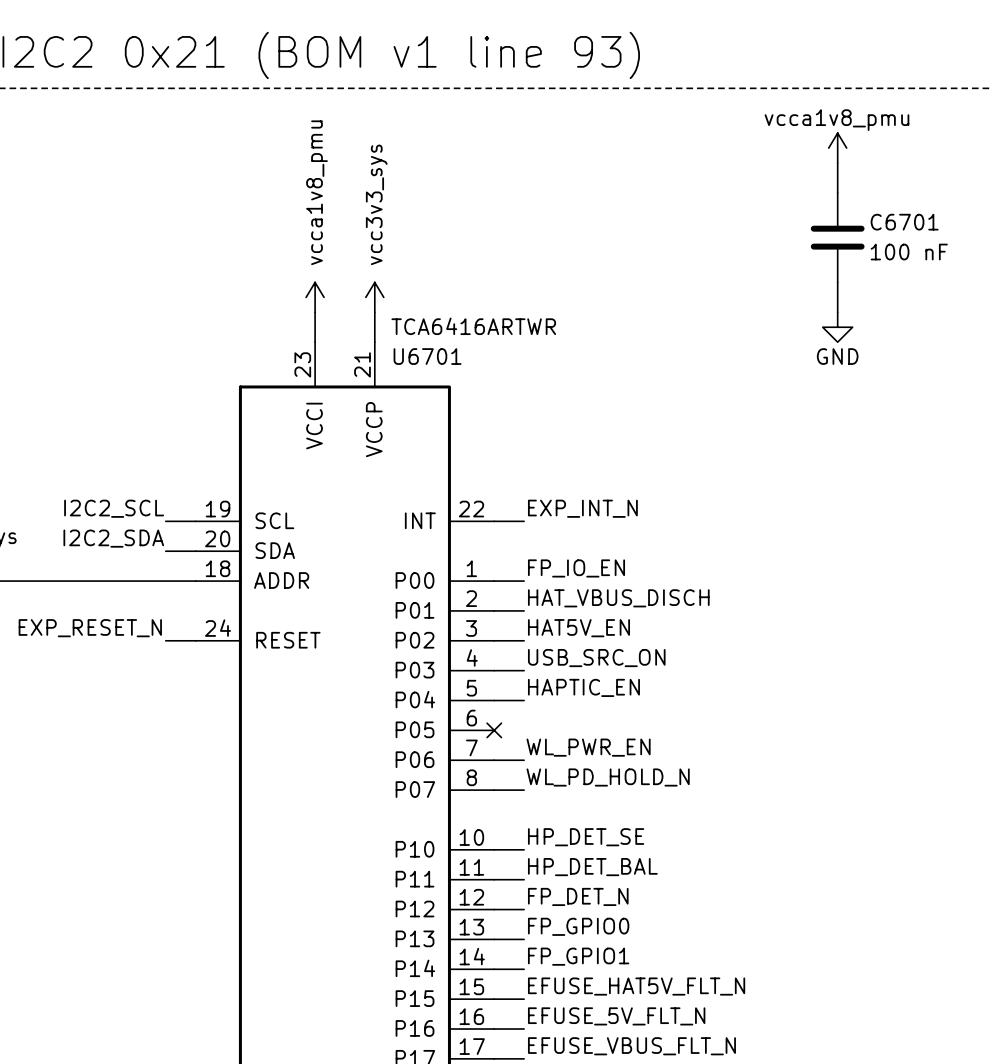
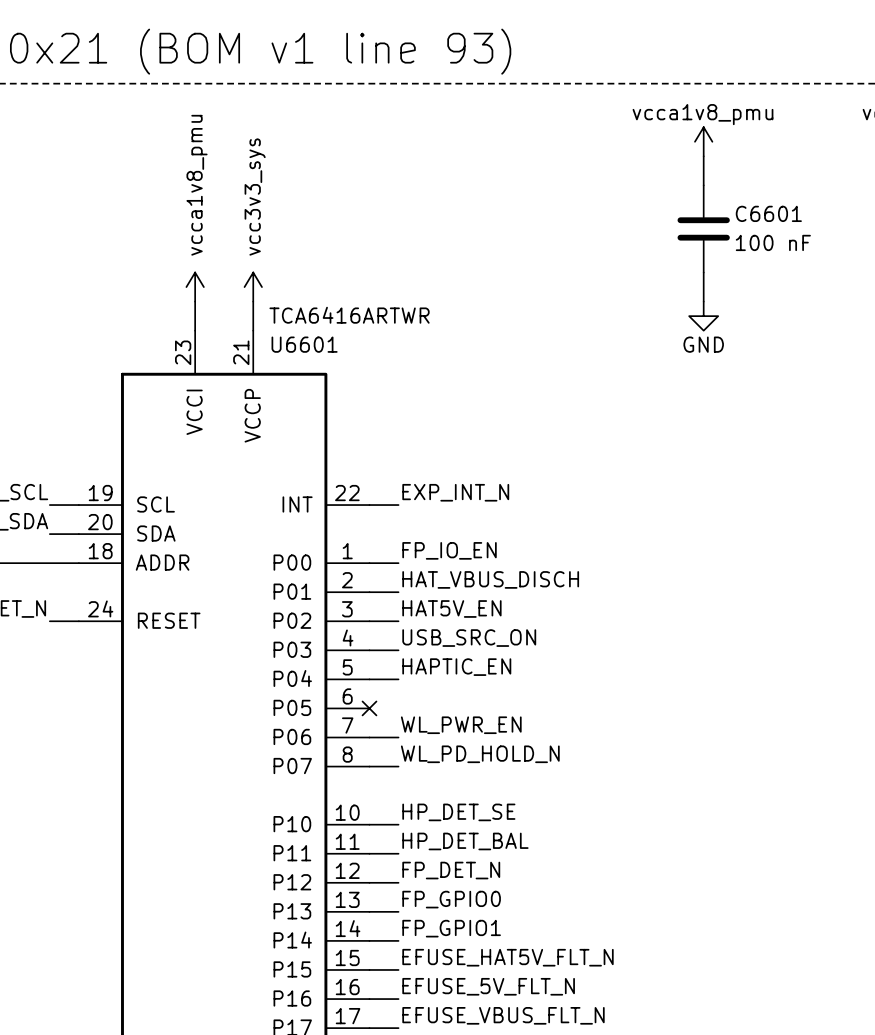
C6701 name: C6701 (904, 222) -> C6601 (768, 213)
U6701 name: U6701 (427, 356) -> U6601 (304, 344)

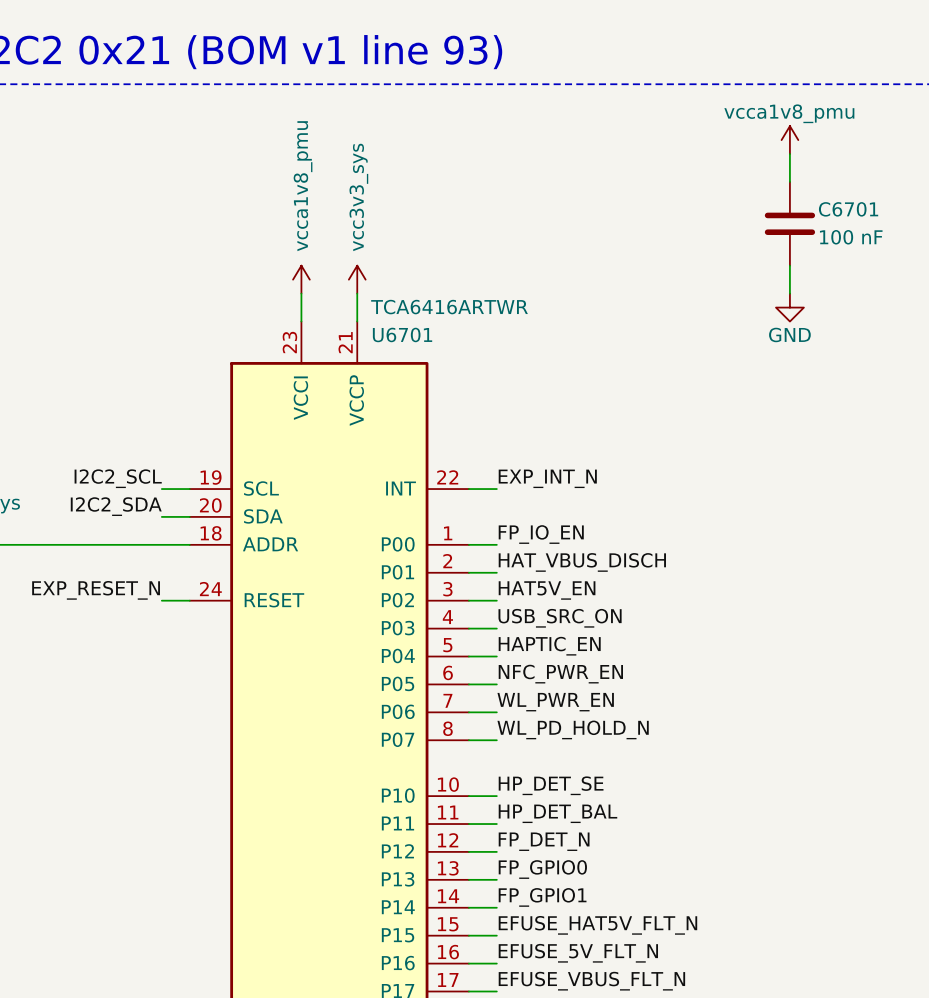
C6601 name: C6601 (768, 213) -> C6701 (848, 209)
U6601 name: U6601 (304, 344) -> U6701 (402, 334)
label: none -> NFC_PWR_EN (560, 674)
wire: none -> (468, 684) (496, 684)
no-connect mark: (369, 708) -> none

